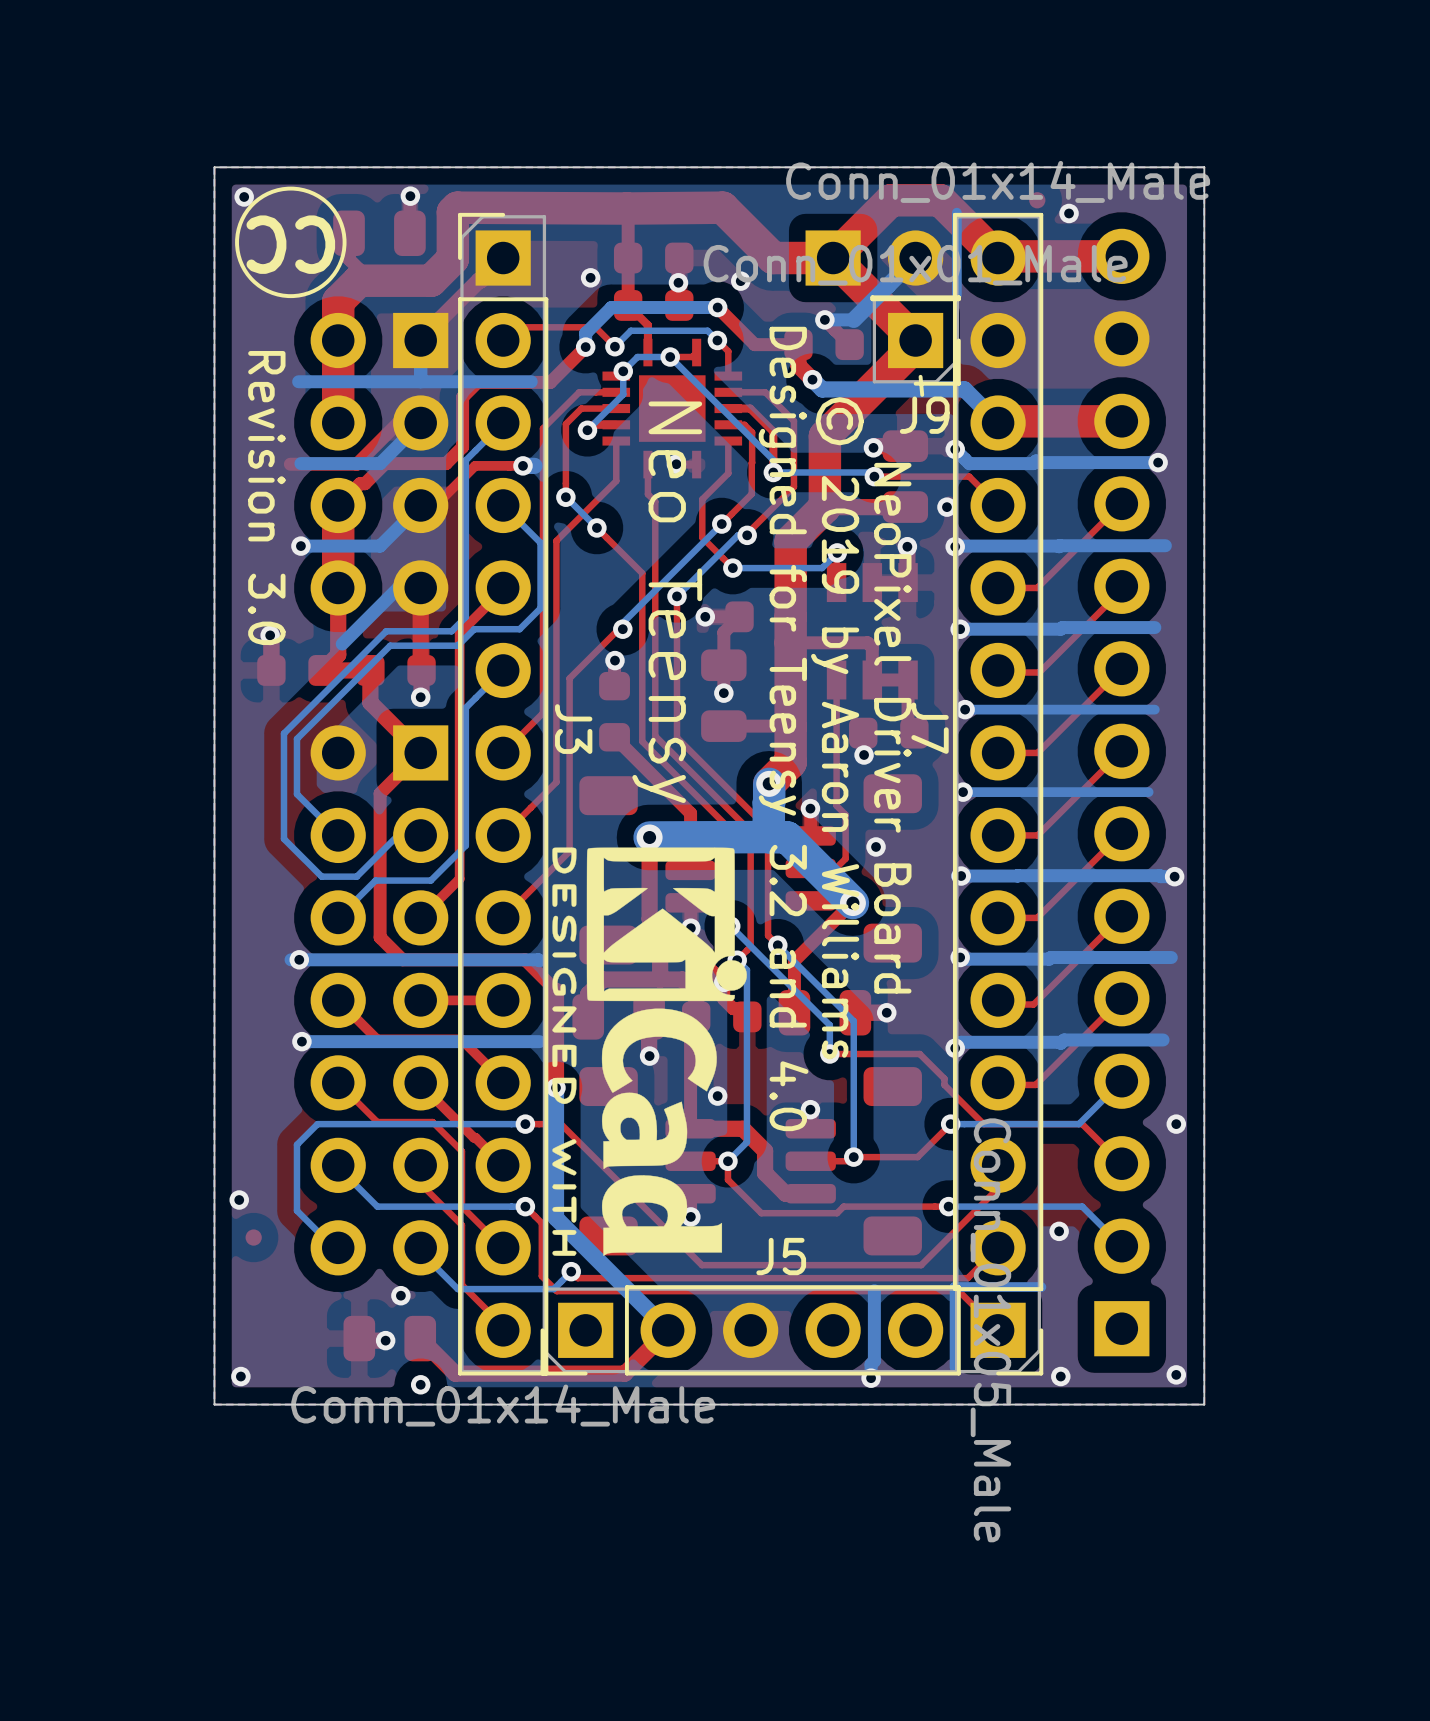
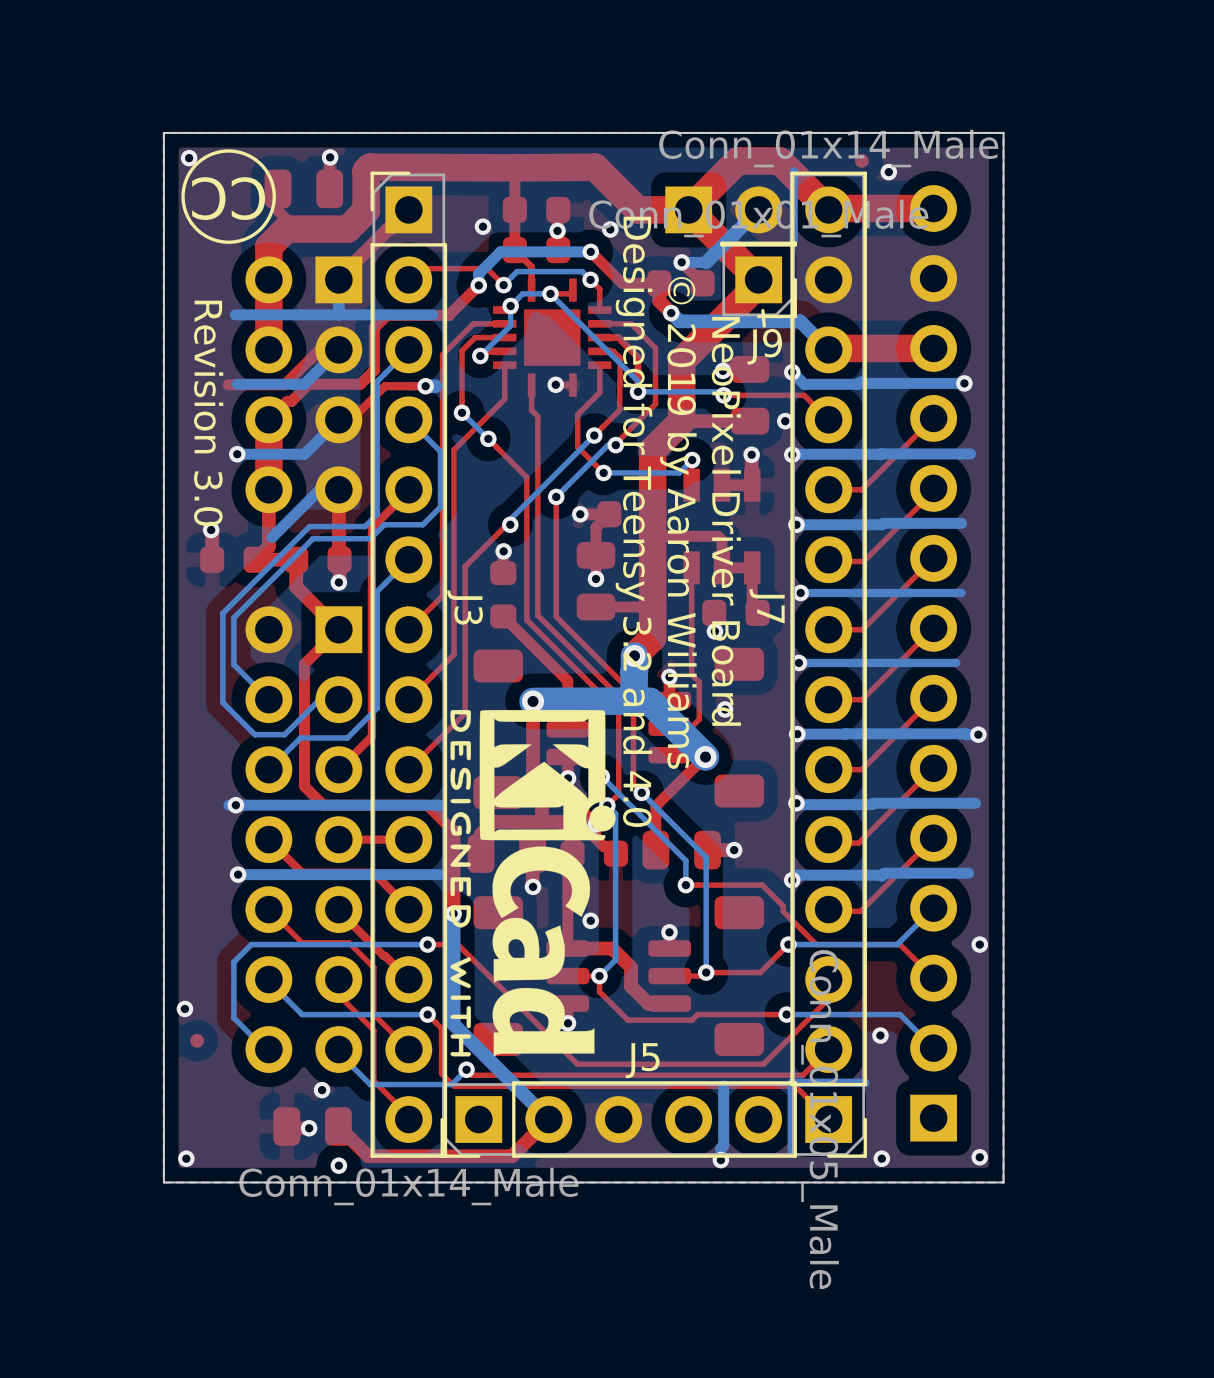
text: Neo Teensy (667, 602) -> none
text position: Designed for Teensy 3.2 and 4.0 (783, 728) -> Designed for Teensy 3.2 and 4.0 (634, 521)
text position: © 2019 by Aaron Williams (837, 728) -> © 2019 by Aaron Williams (678, 522)
text position: NeoPixel Driver Board (892, 728) -> NeoPixel Driver Board (726, 521)

